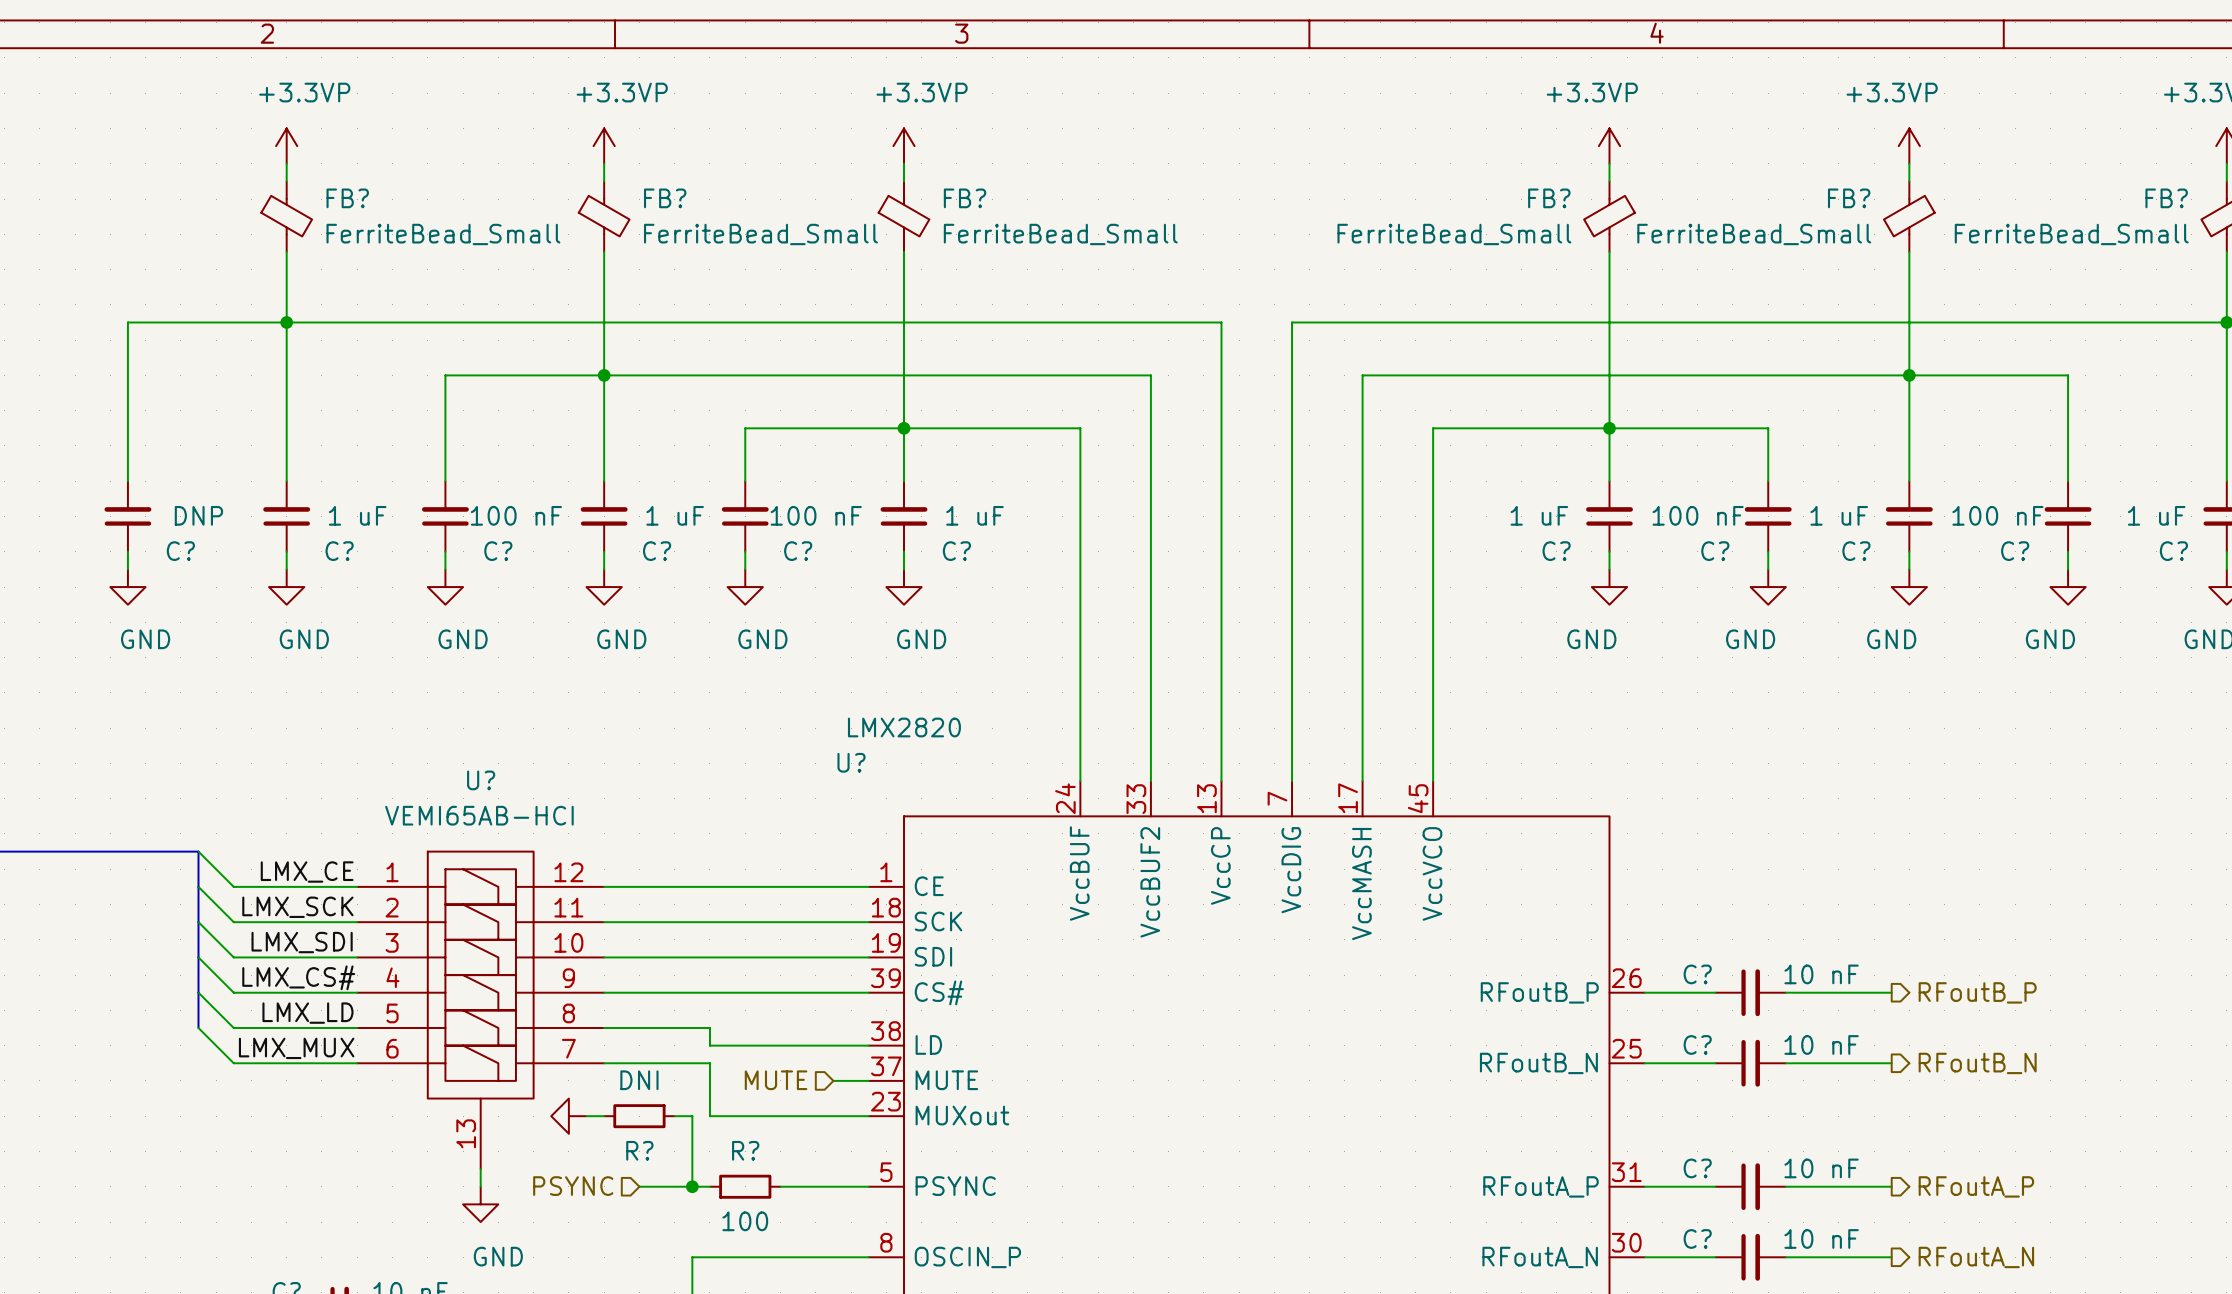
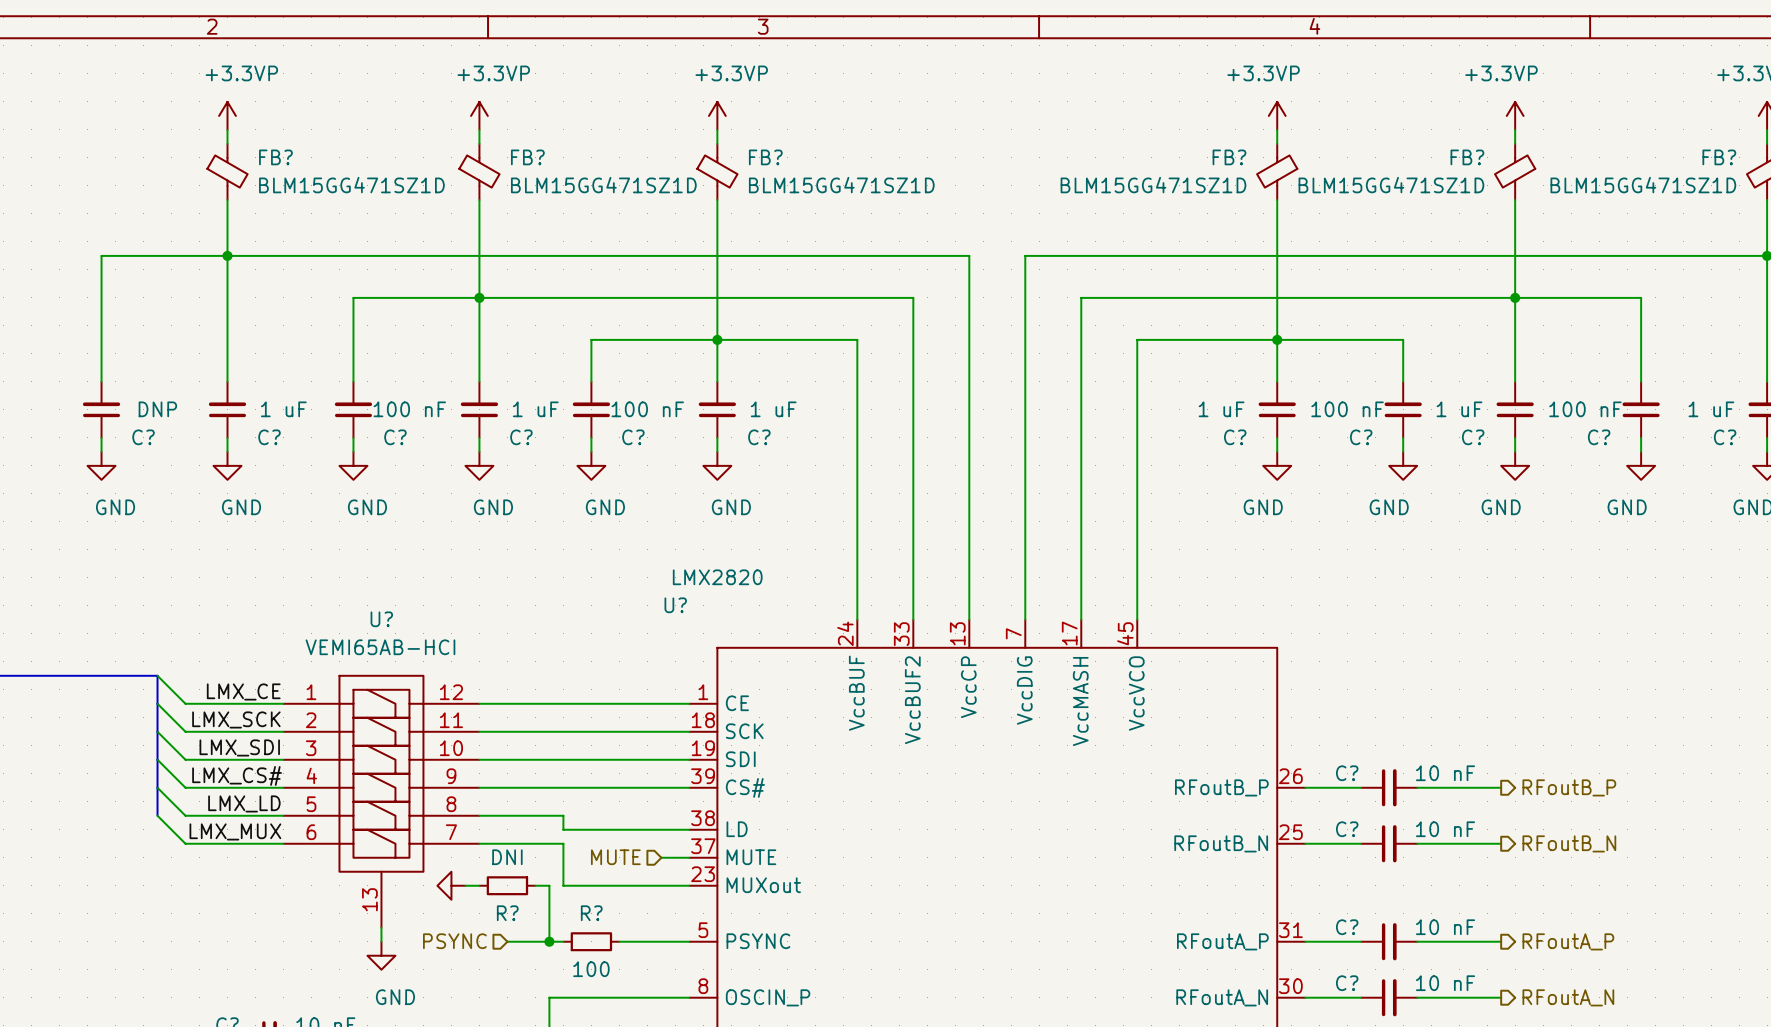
FB? value: FerriteBead_Small (443, 234) -> BLM15GG471SZ1D (351, 185)
FB? value: FerriteBead_Small (760, 234) -> BLM15GG471SZ1D (603, 185)
FB? value: FerriteBead_Small (1060, 234) -> BLM15GG471SZ1D (841, 185)
FB? value: FerriteBead_Small (1454, 234) -> BLM15GG471SZ1D (1153, 185)
FB? value: FerriteBead_Small (1754, 234) -> BLM15GG471SZ1D (1391, 185)
FB? value: FerriteBead_Small (2071, 234) -> BLM15GG471SZ1D (1643, 185)

